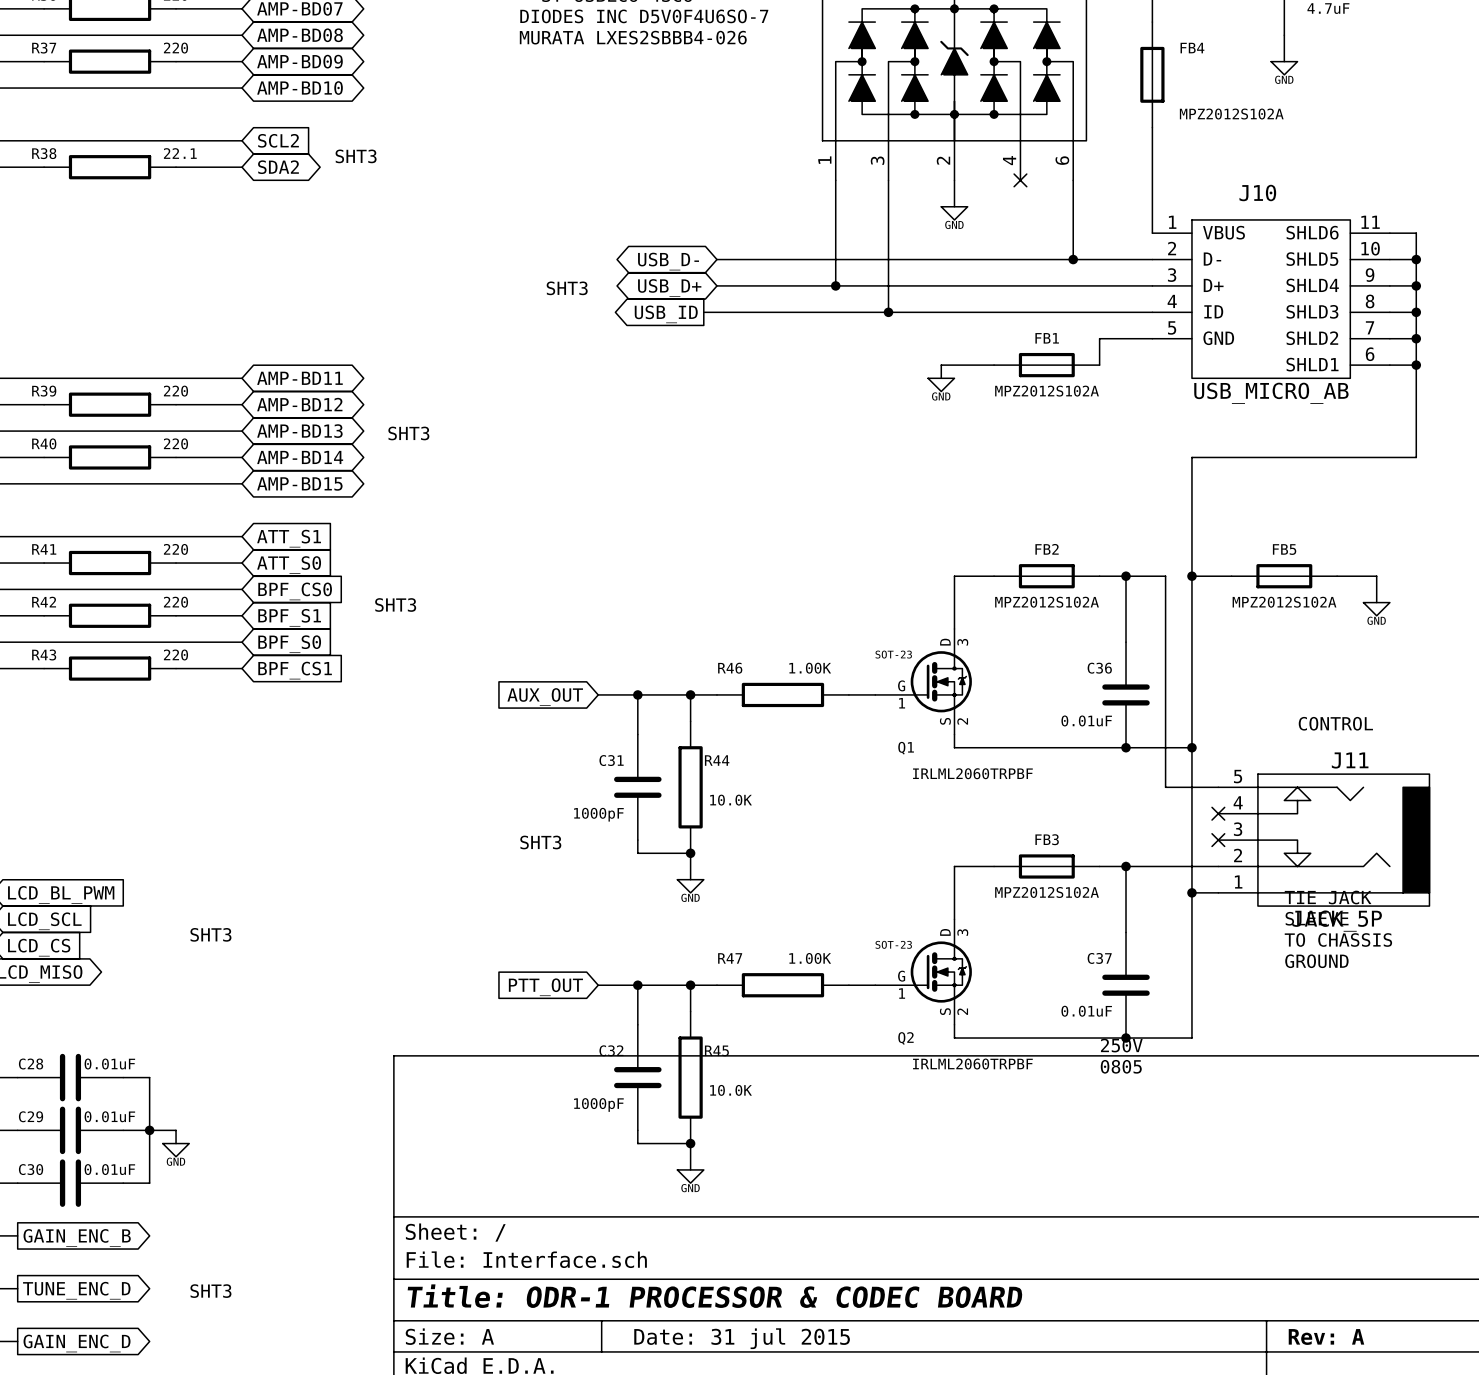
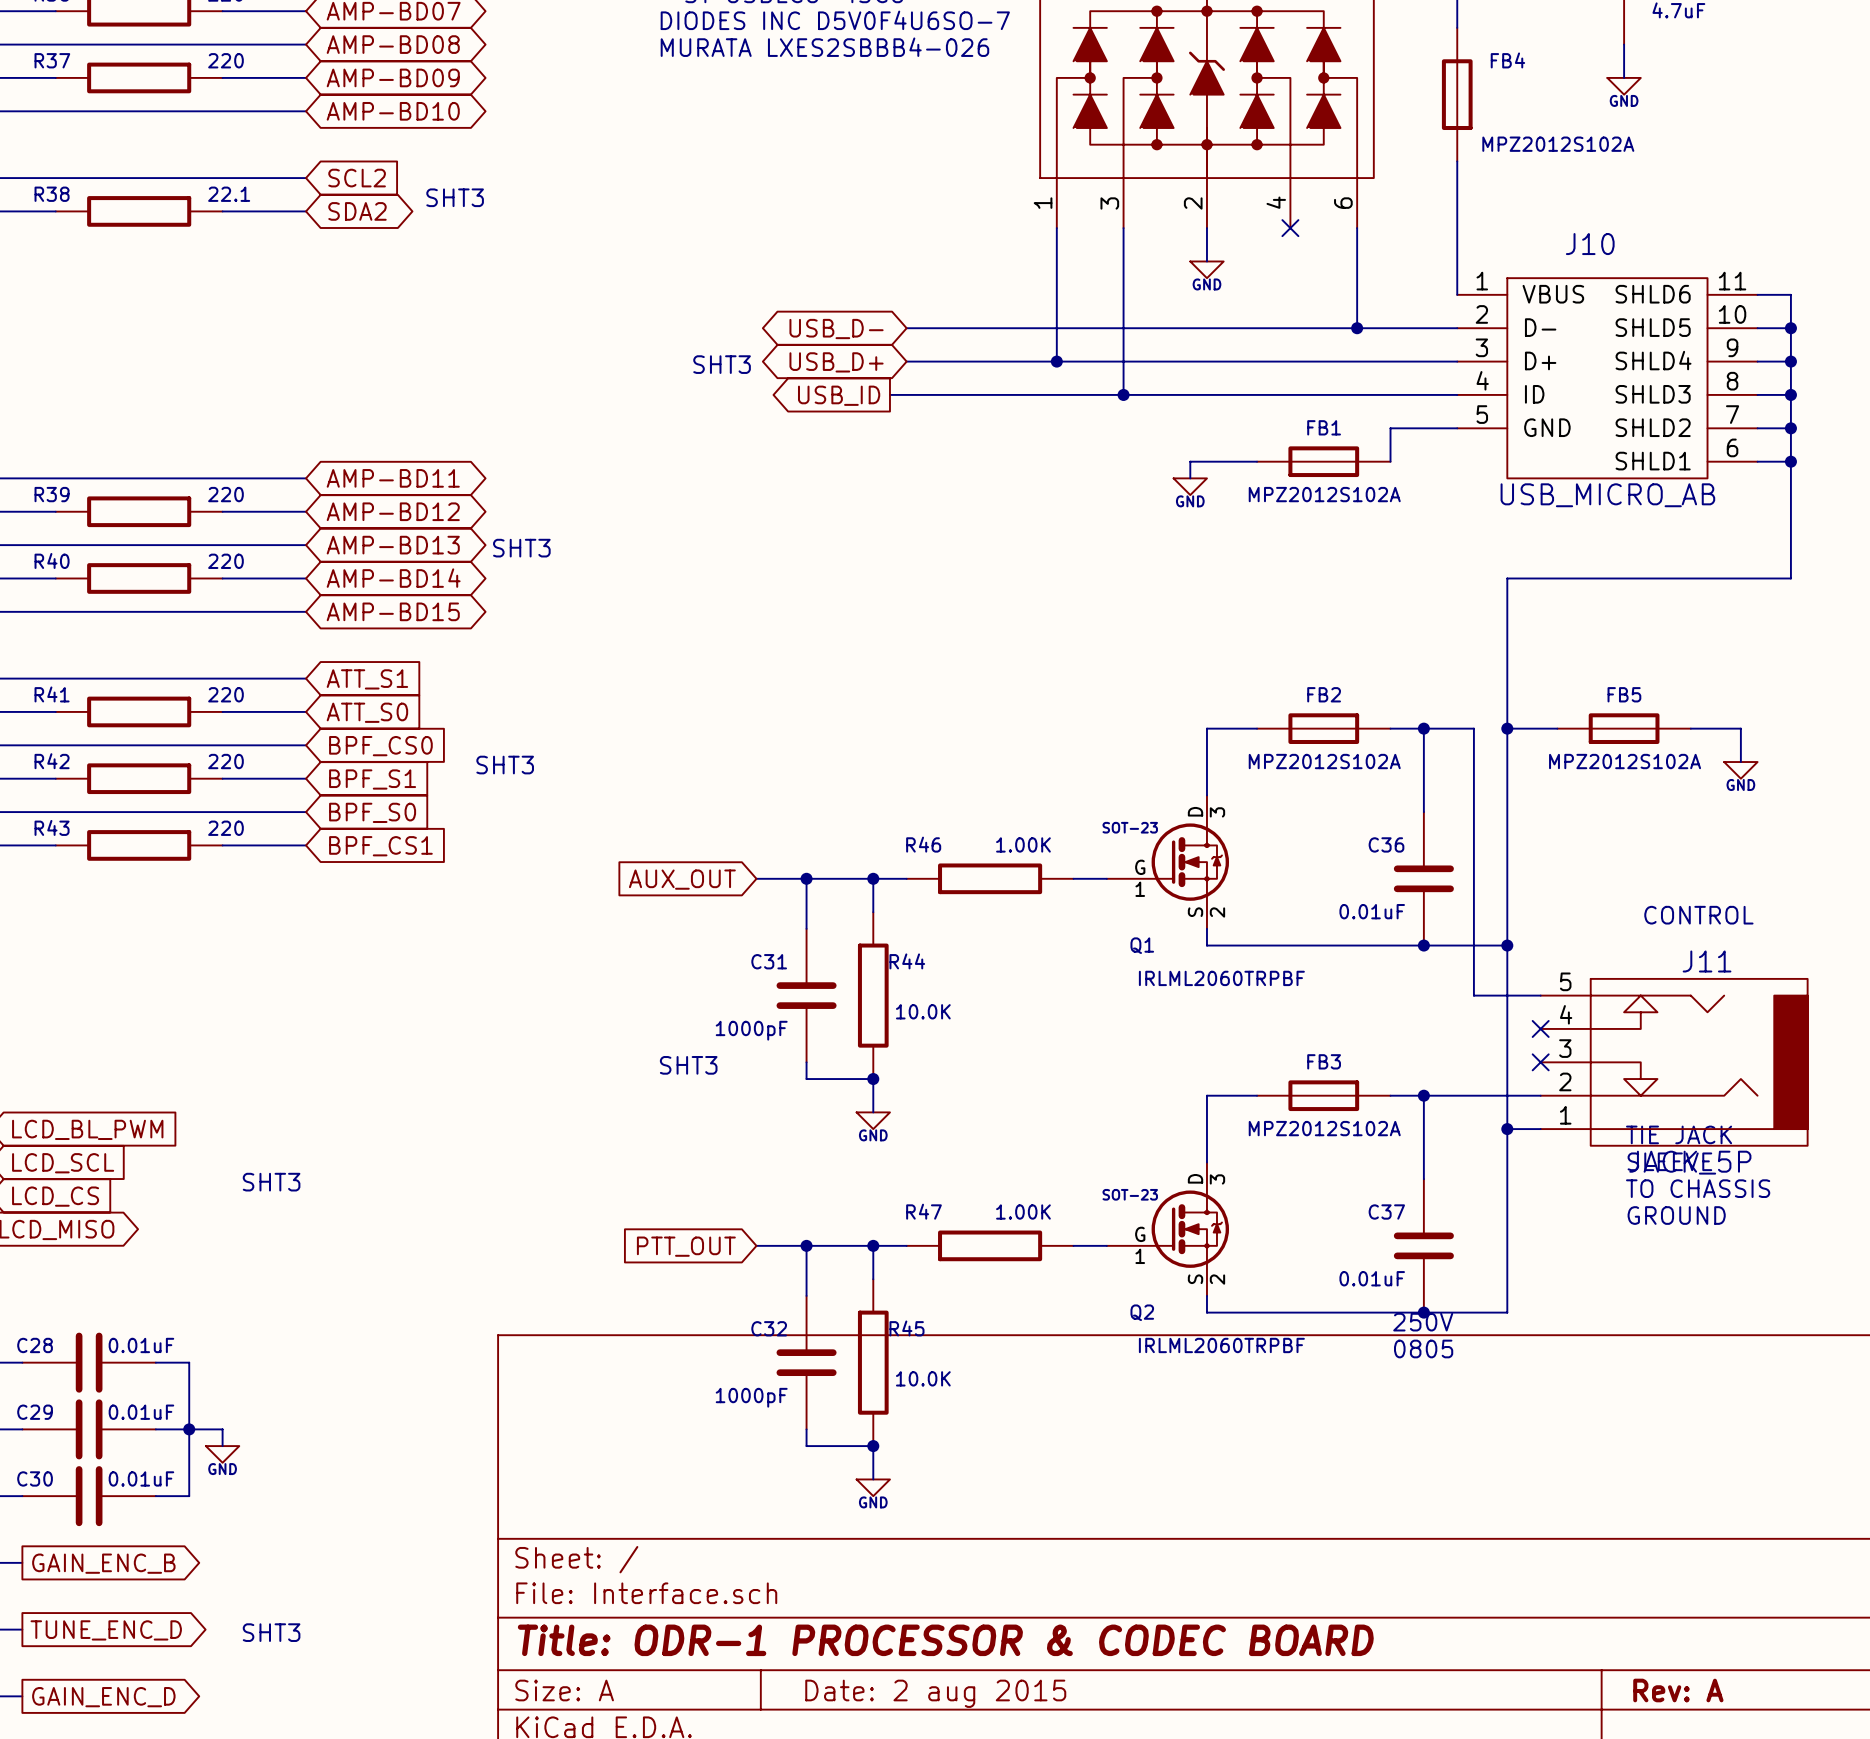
title block: Date: 31 jul 2015 (742, 1338) -> Date: 2 aug 2015 (935, 1693)

